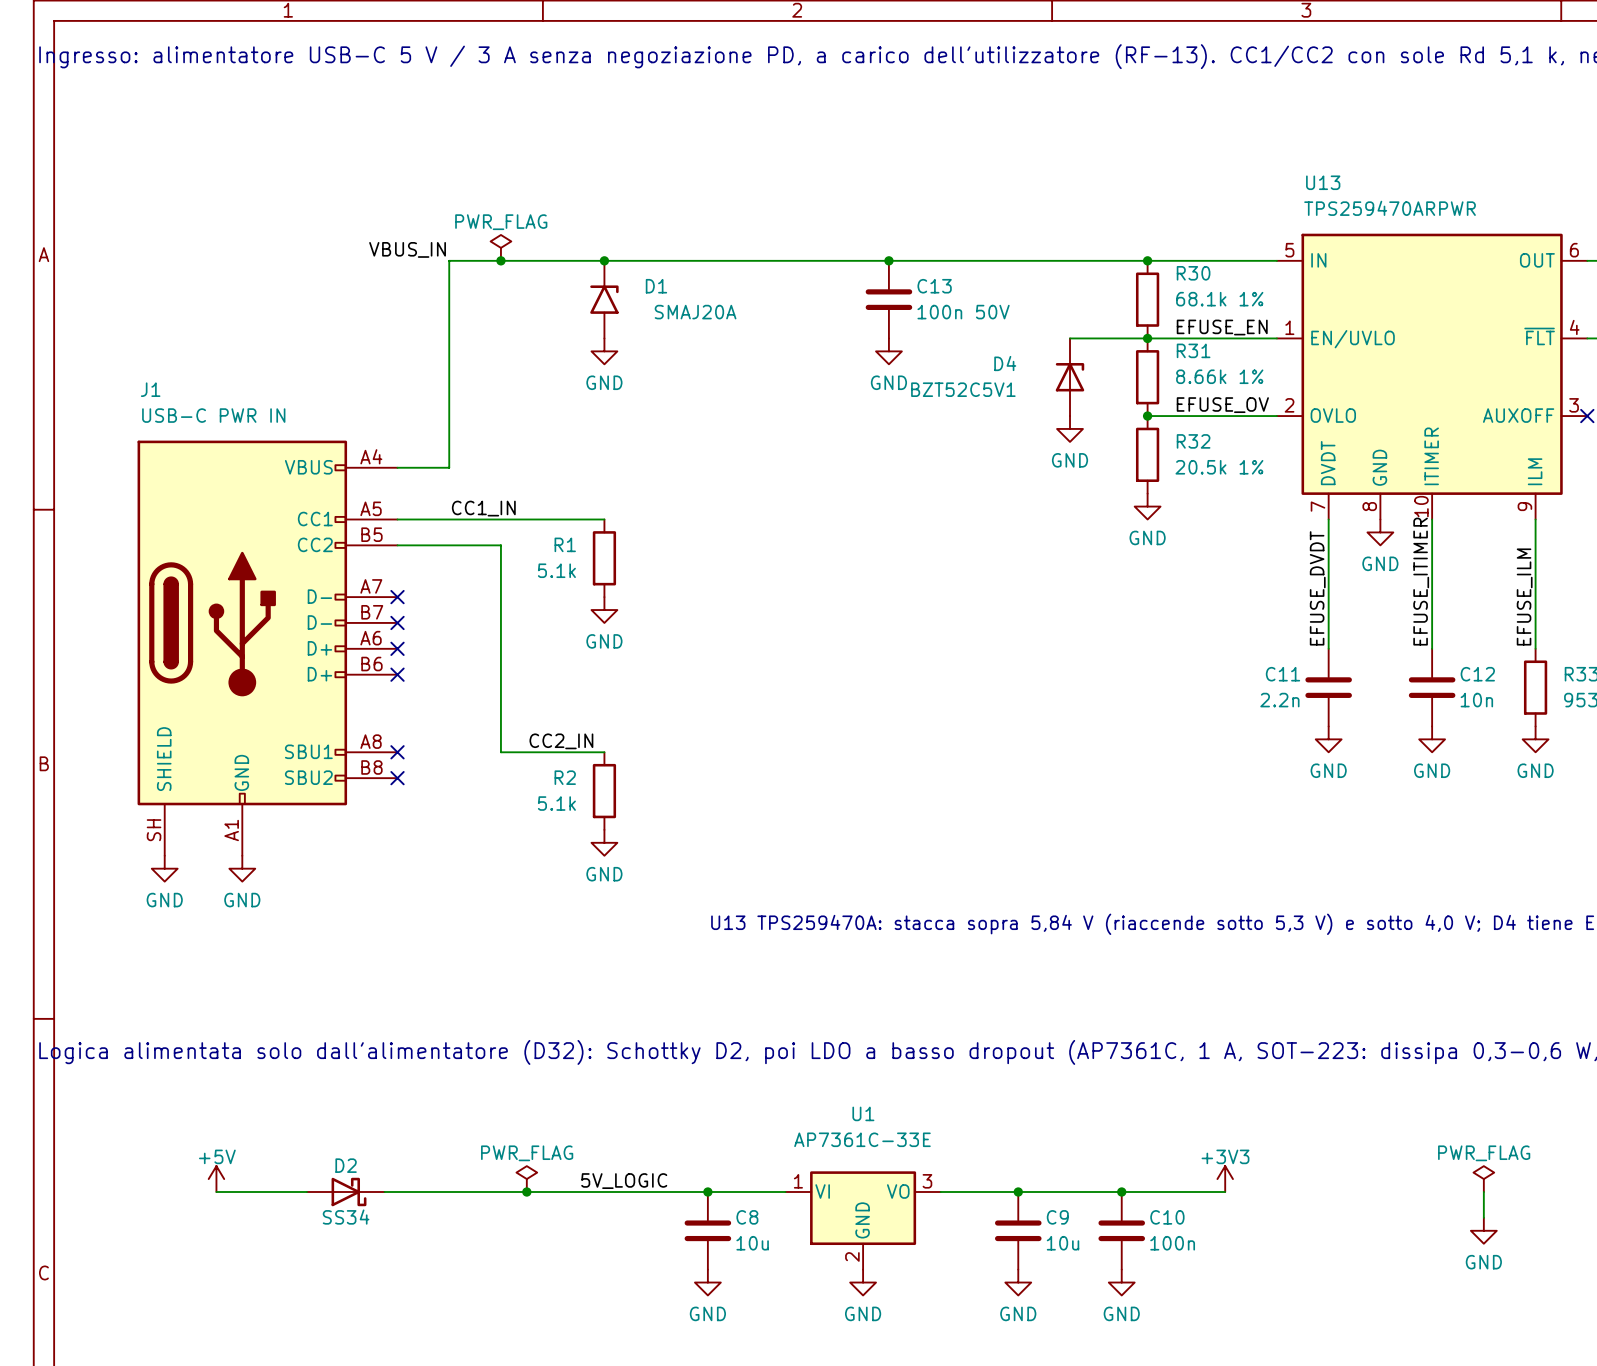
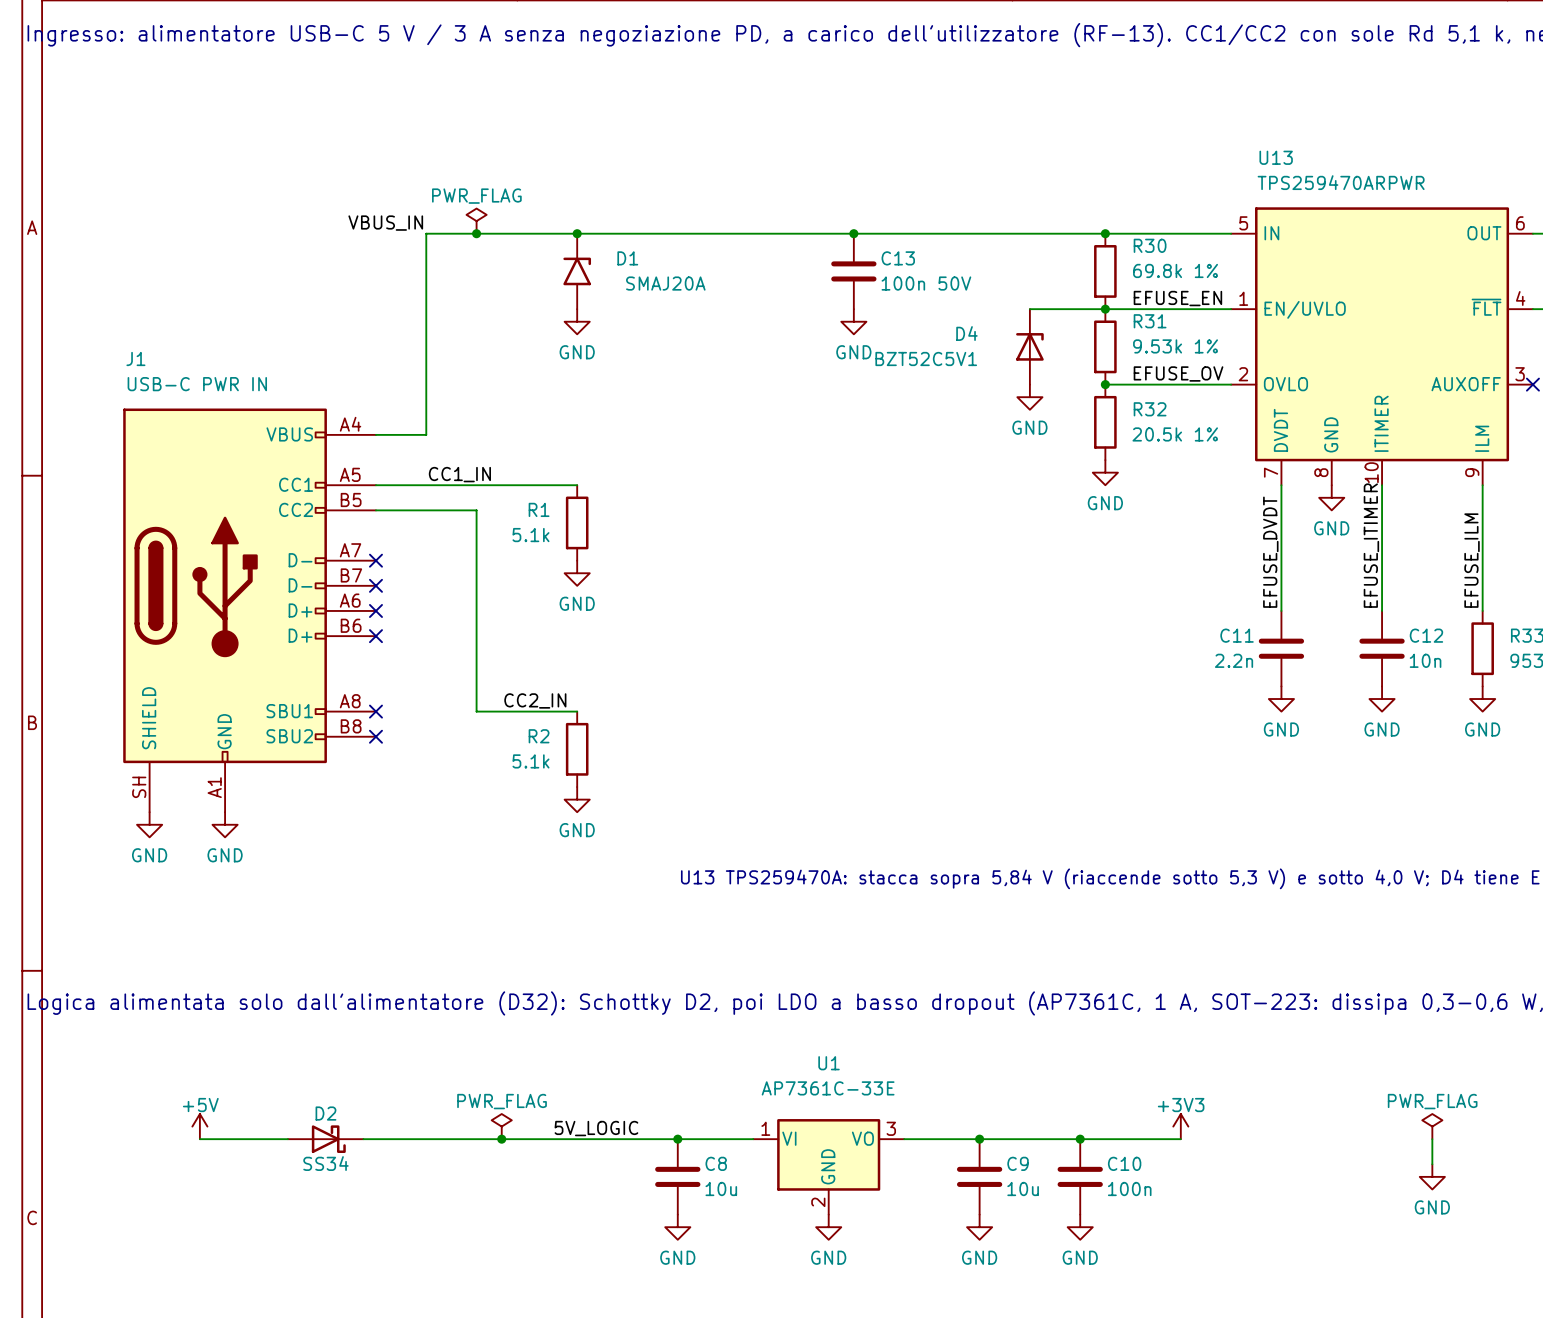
R30 value: 68.1k 1% (1219, 299) -> 69.8k 1% (1175, 270)
R31 value: 8.66k 1% (1219, 376) -> 9.53k 1% (1175, 346)

